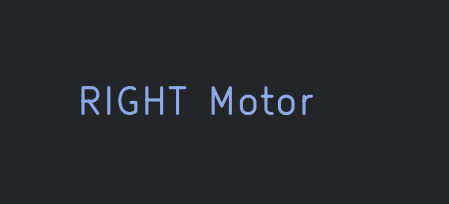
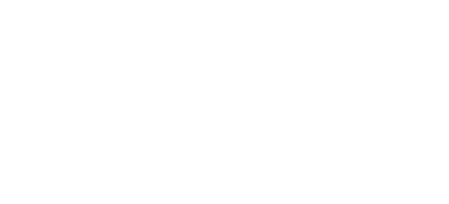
text: RIGHT Motor (197, 100) -> none

